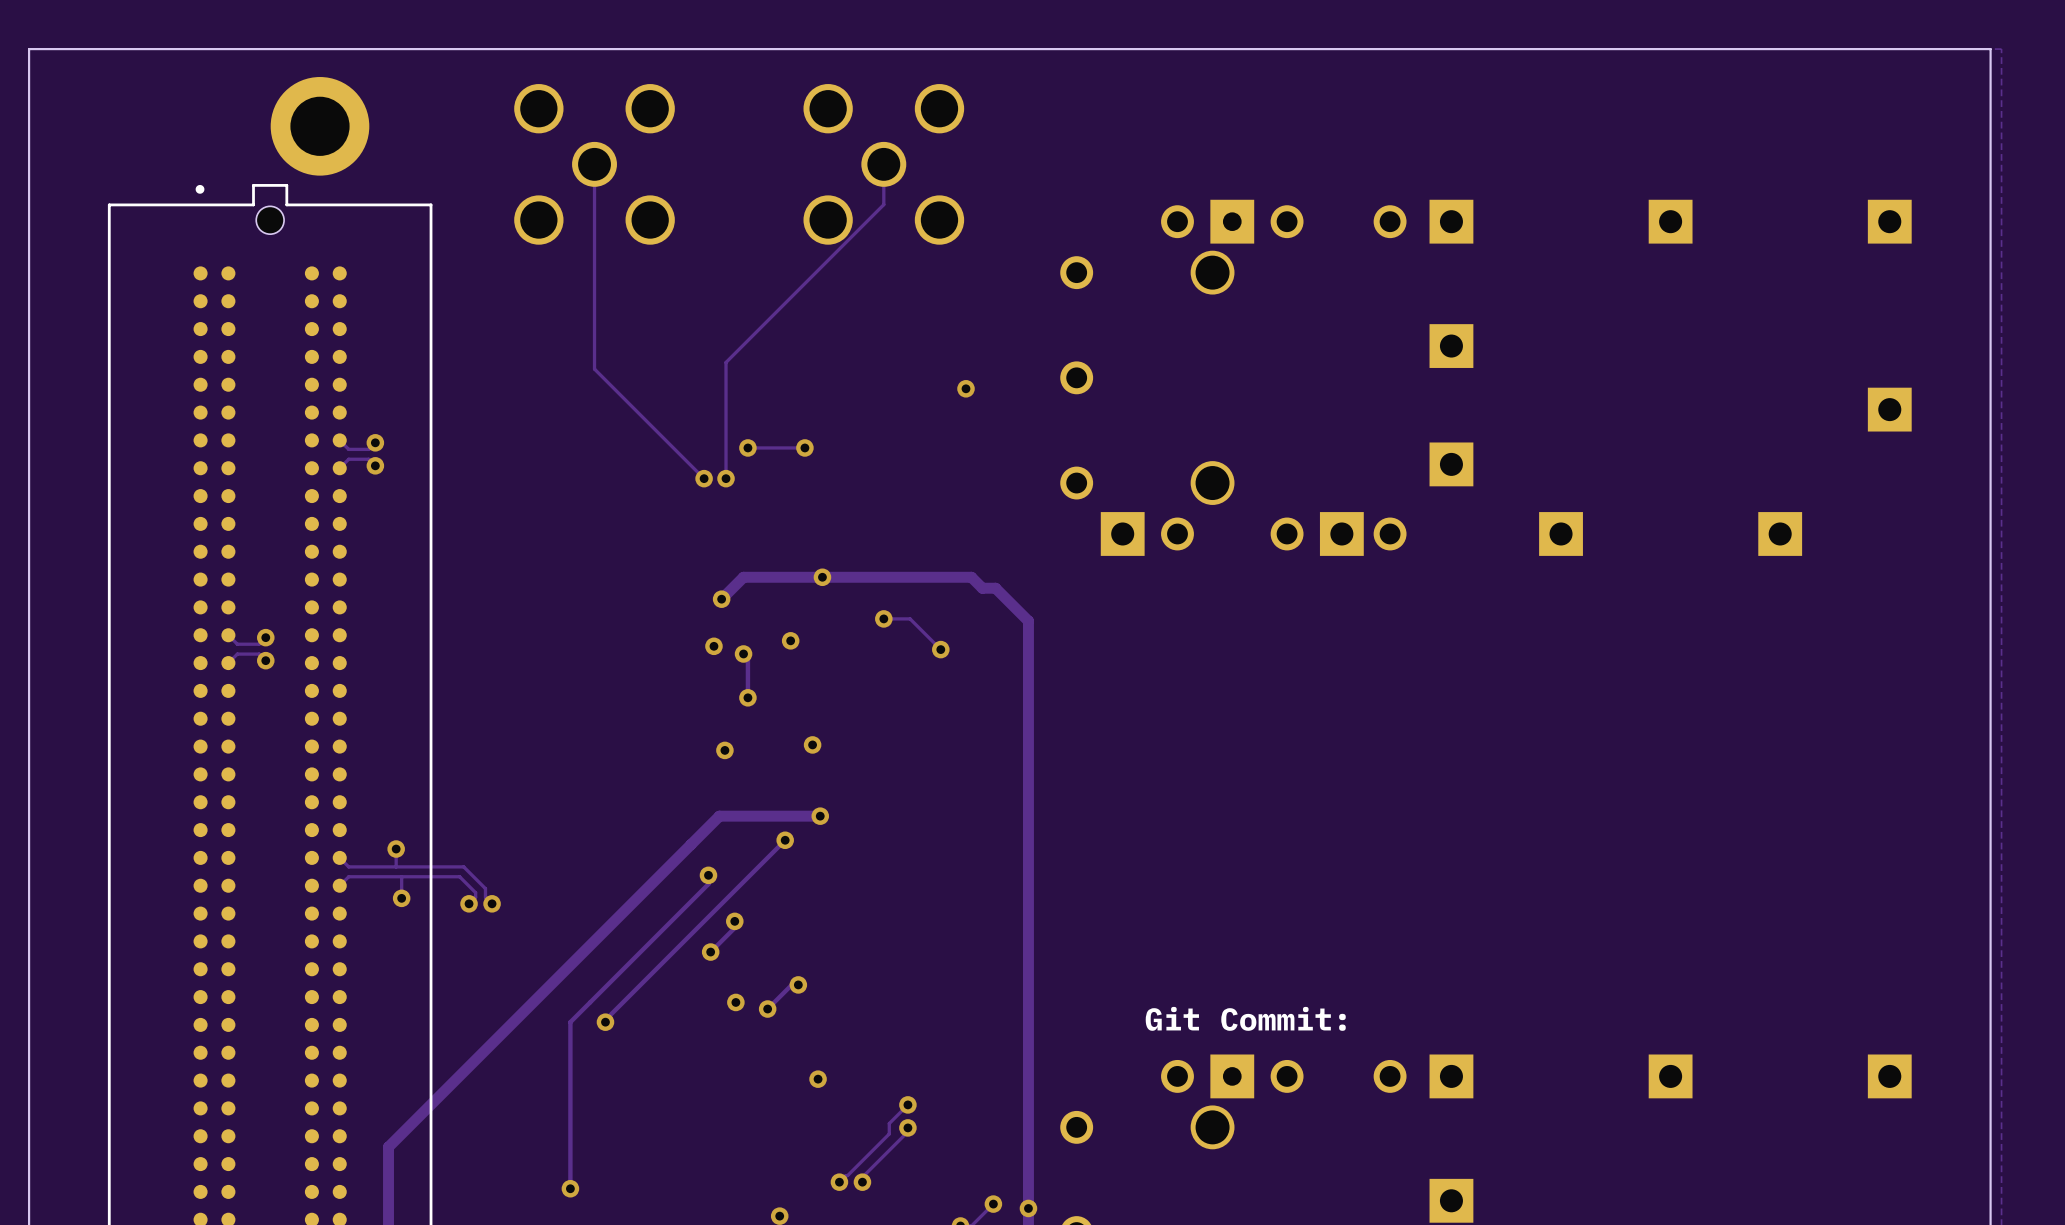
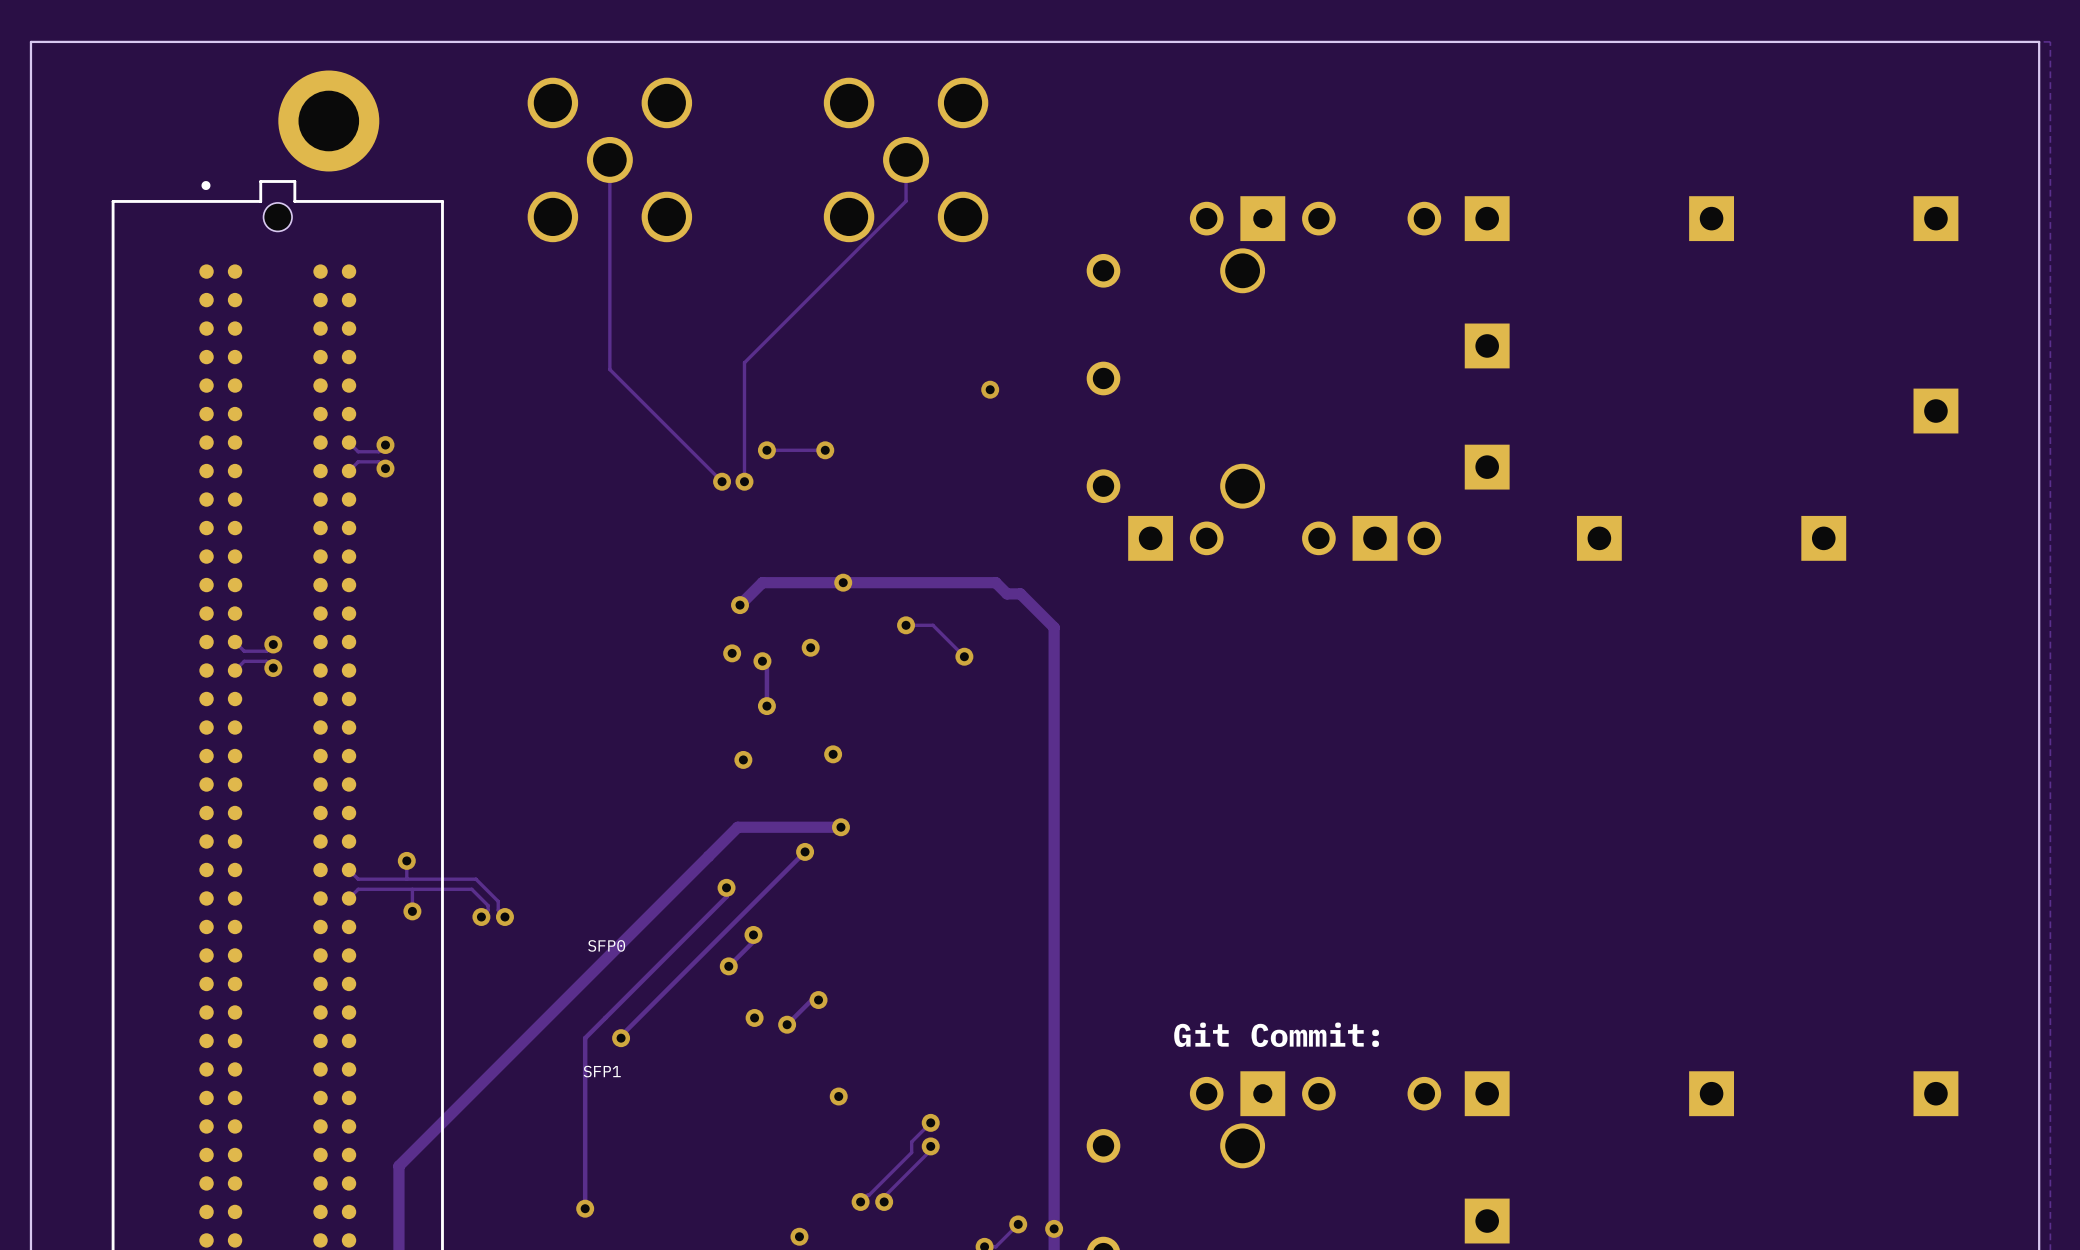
text: none -> SFP0 (606, 945)
text: none -> SFP1 (602, 1071)

